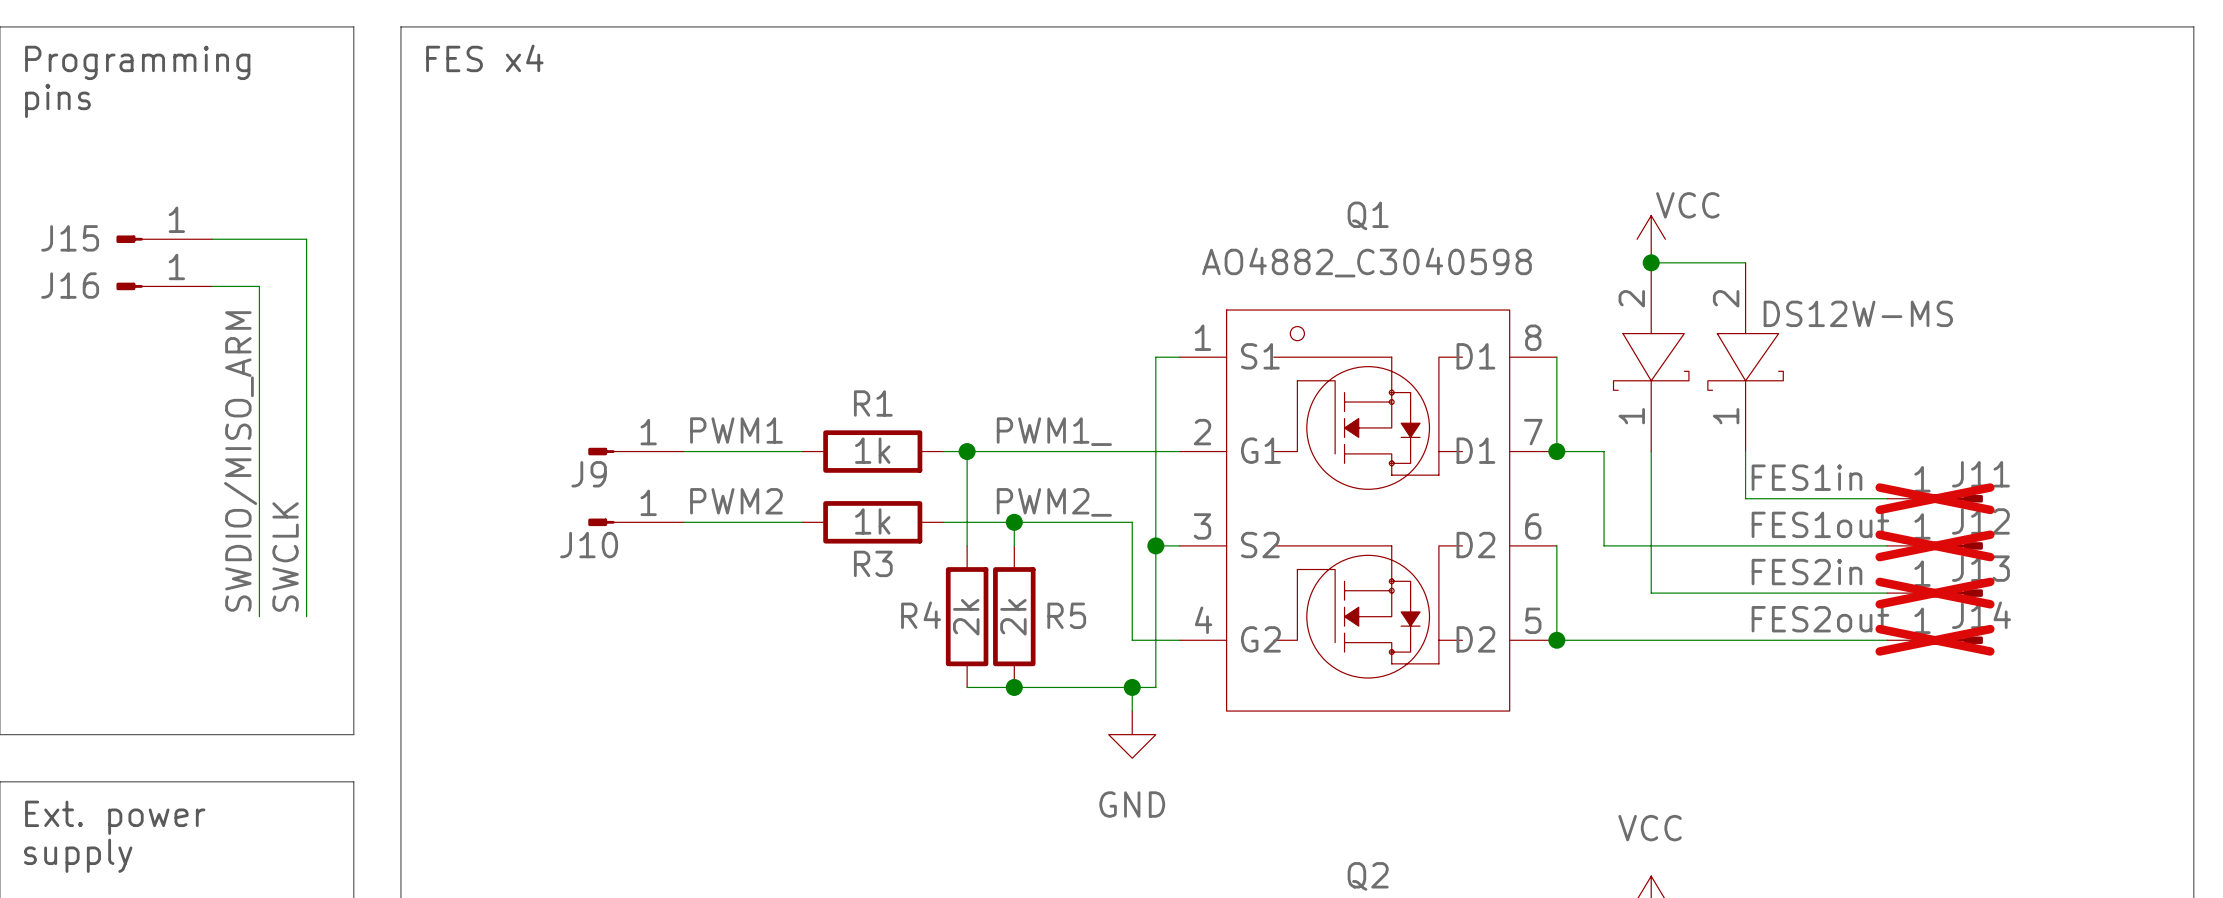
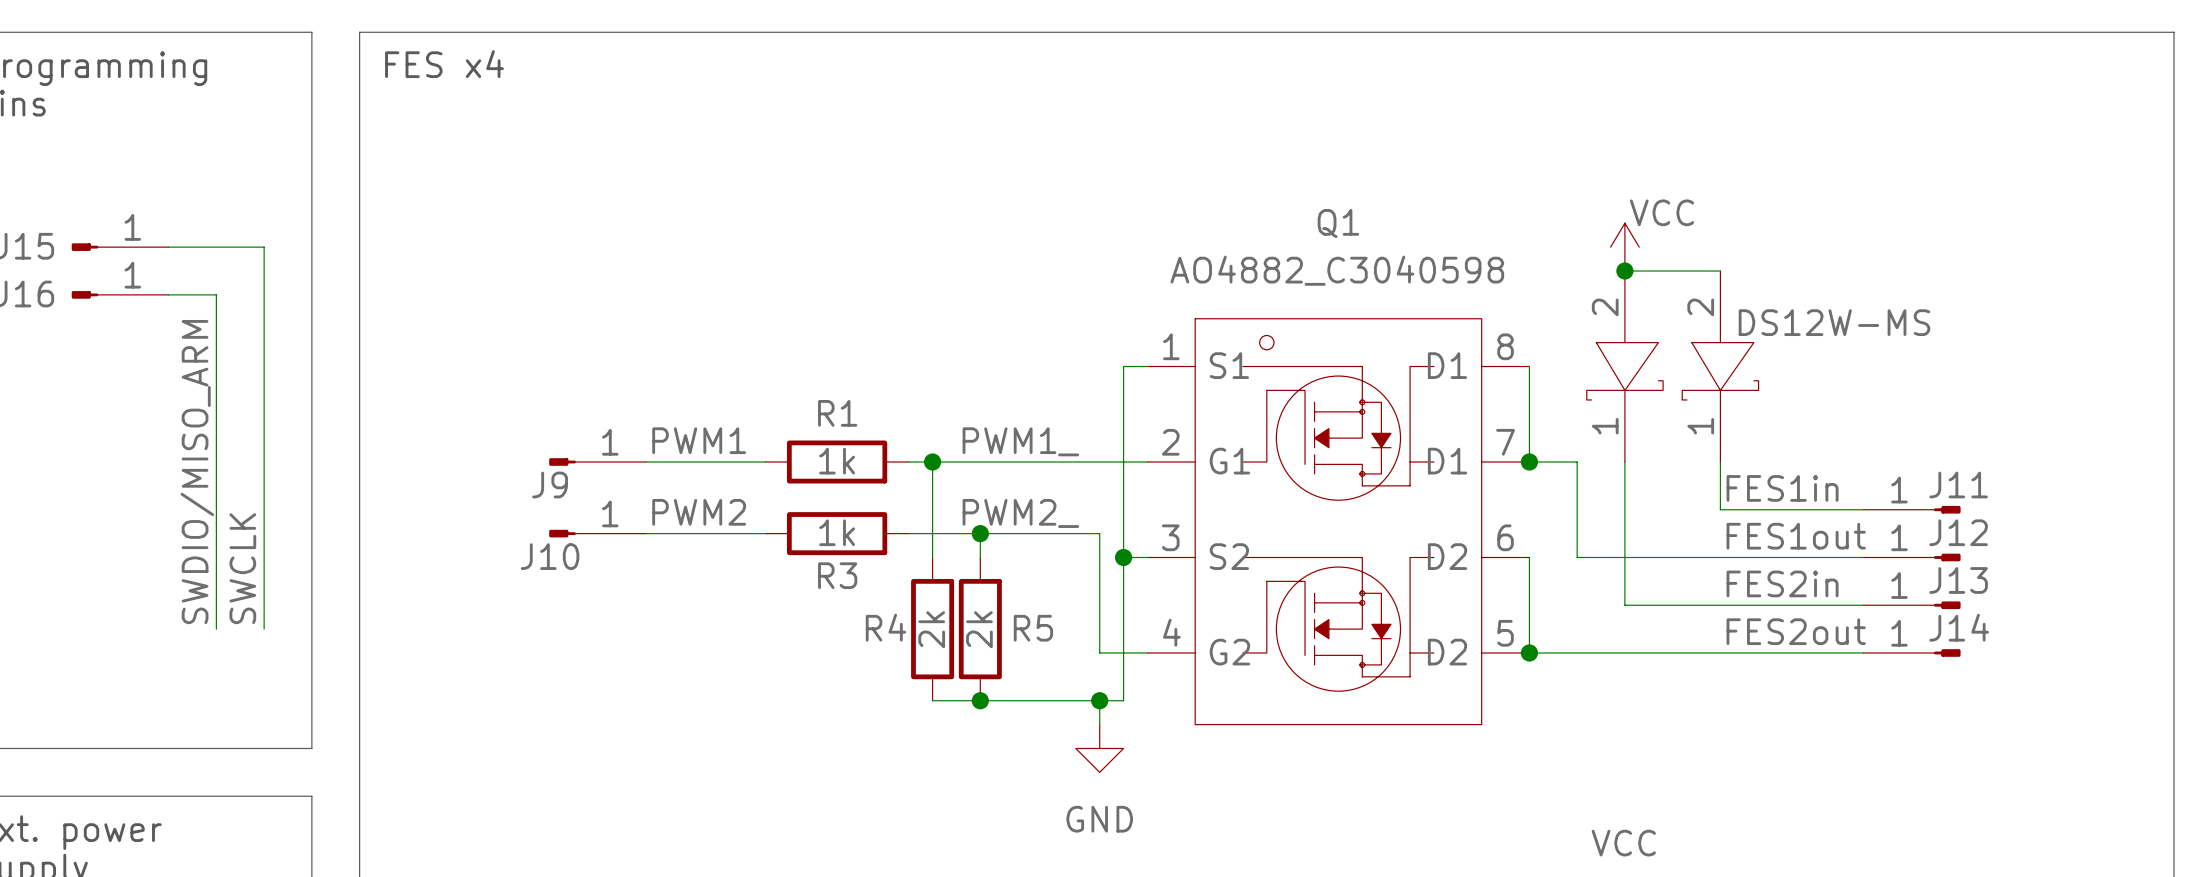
J11 do-not-place cross: (1935, 498) -> none
J12 do-not-place cross: (1935, 545) -> none
J13 do-not-place cross: (1935, 593) -> none
J14 do-not-place cross: (1935, 640) -> none

